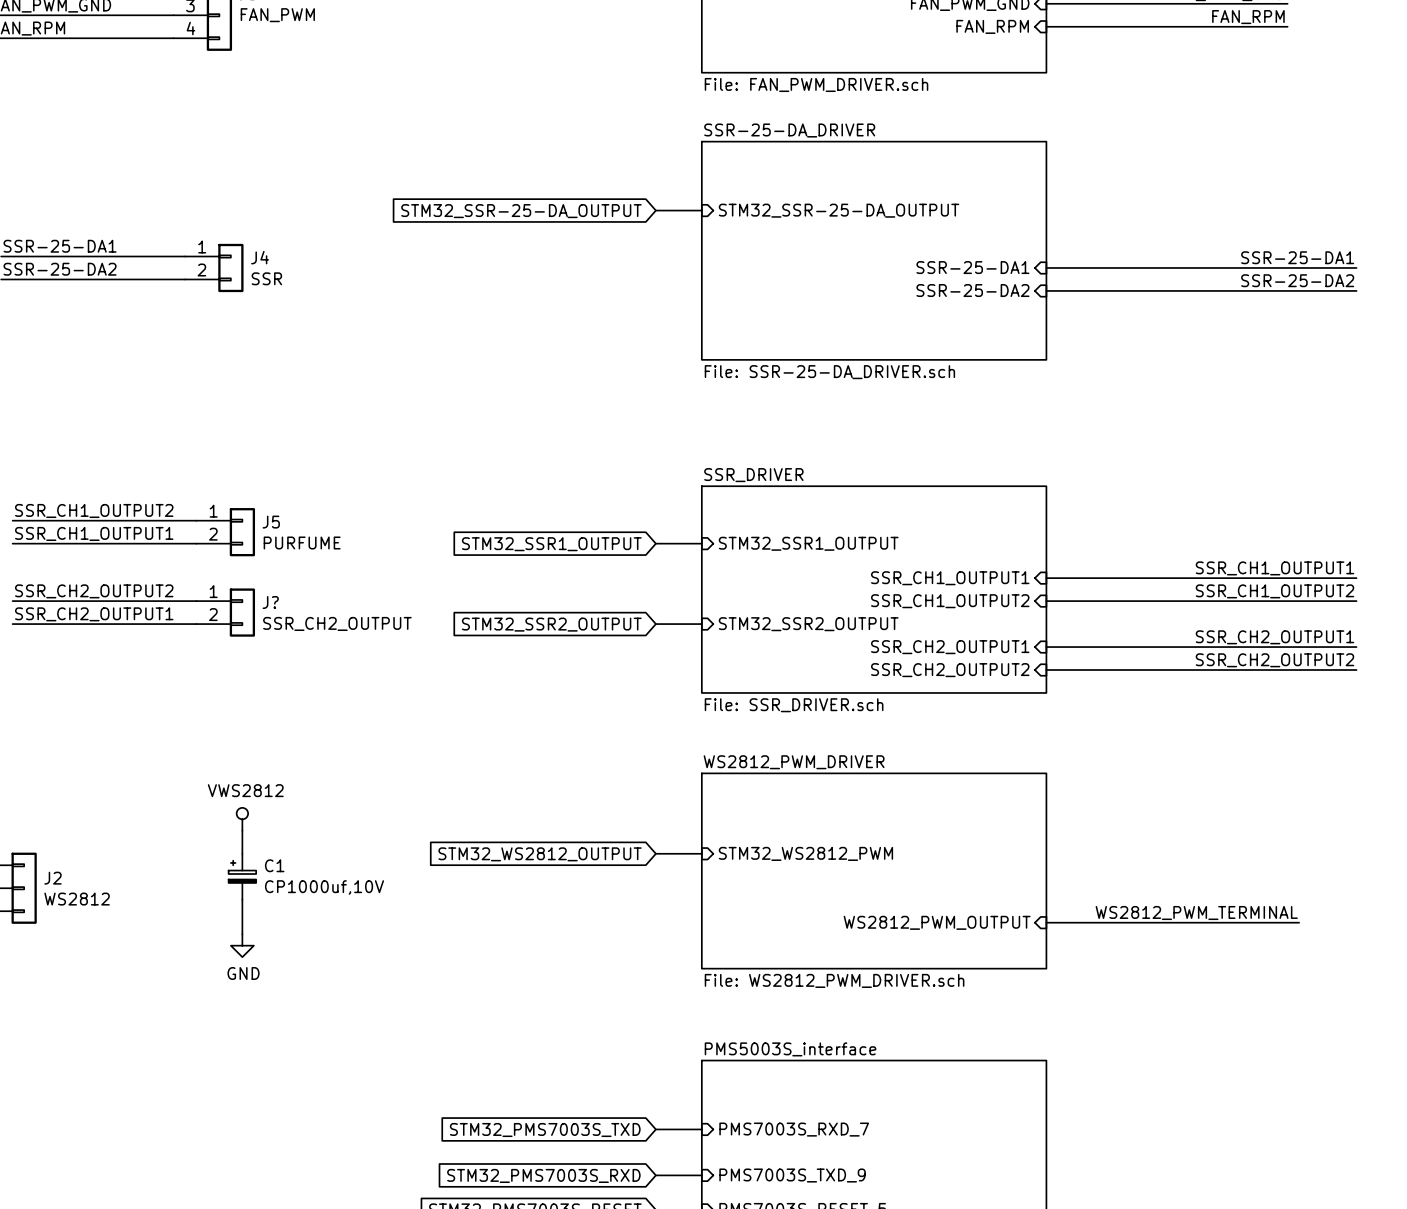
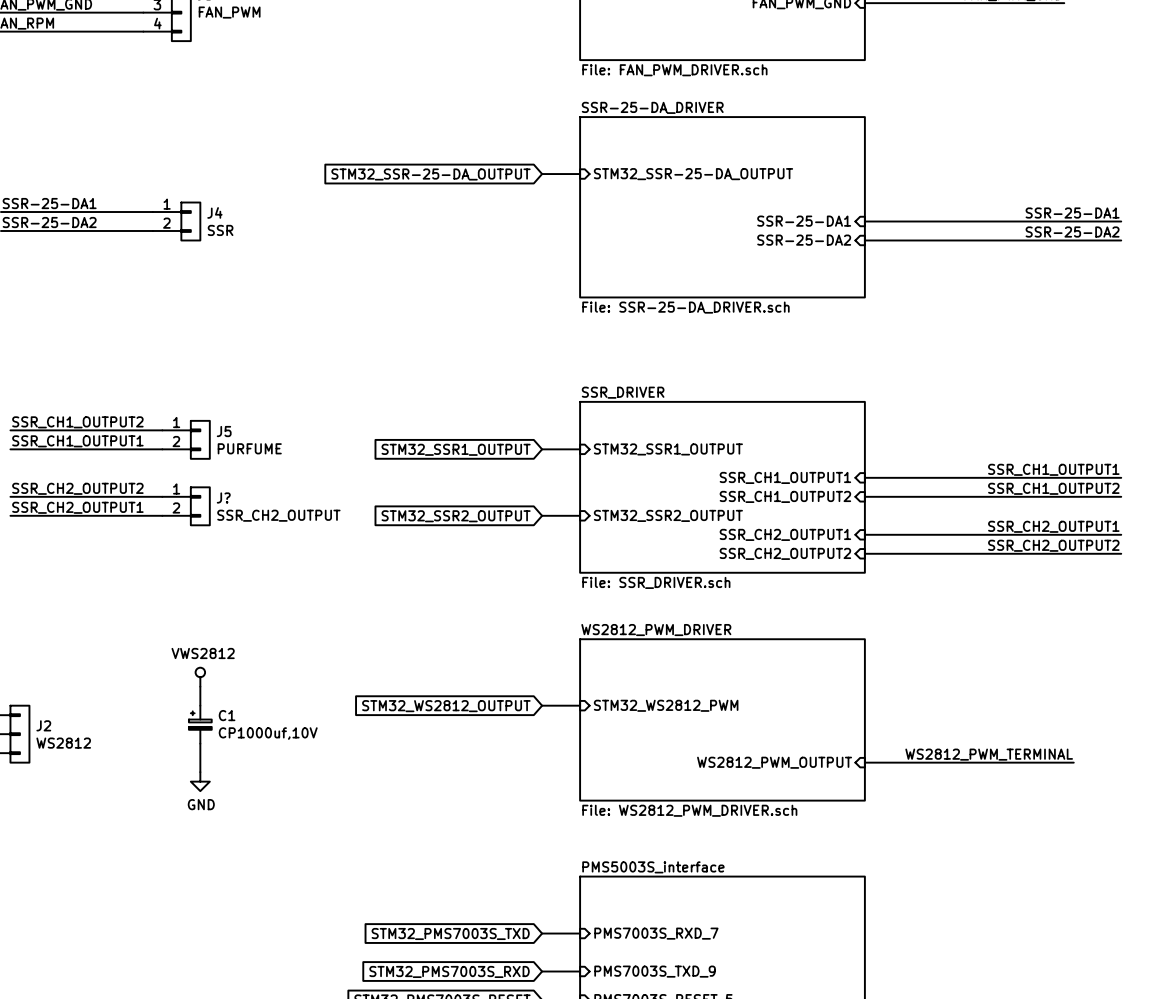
label: FAN_RPM (1248, 17) -> none
sheet pin: FAN_RPM (992, 26) -> none
wire: (1046, 26) (1287, 26) -> none

